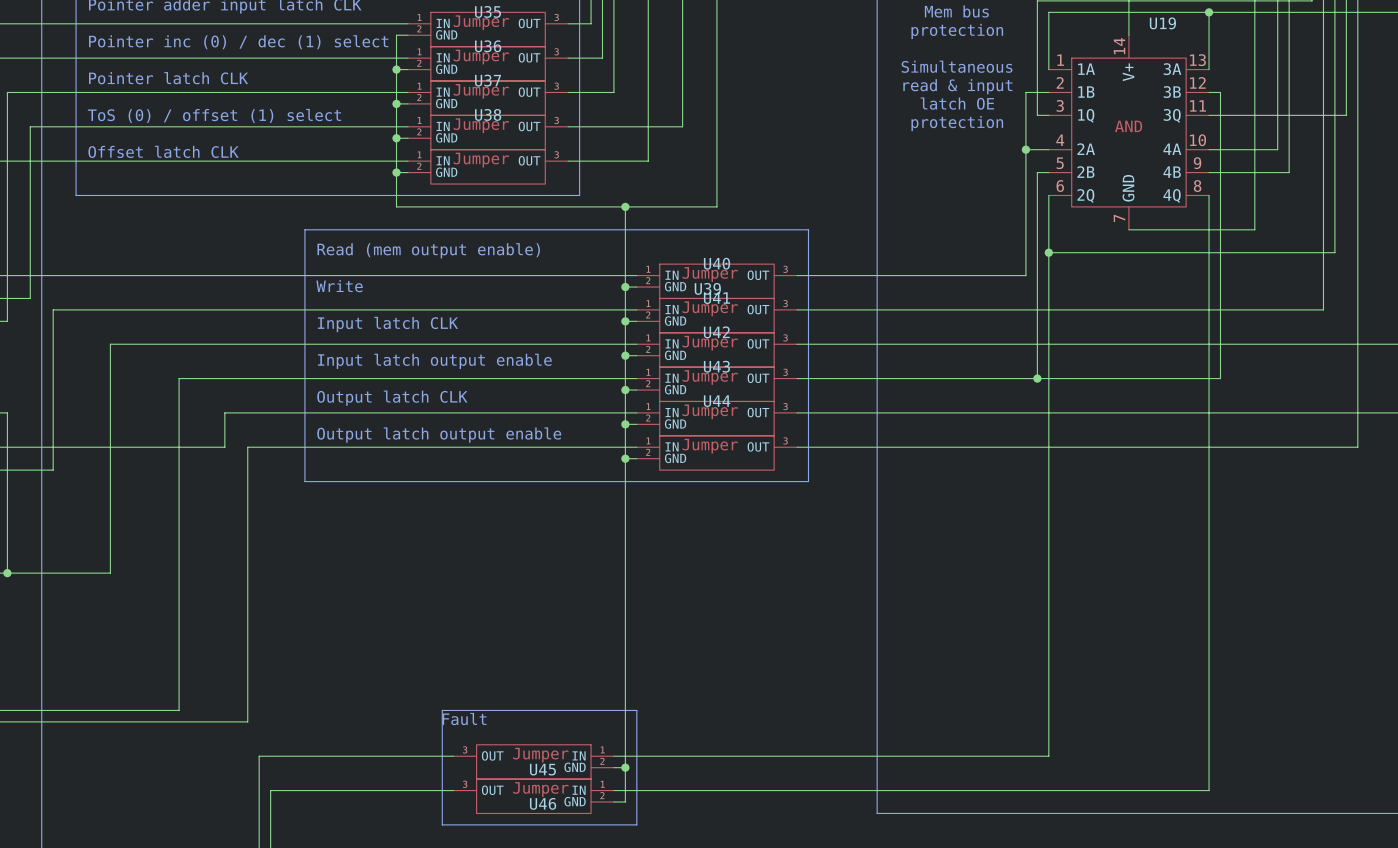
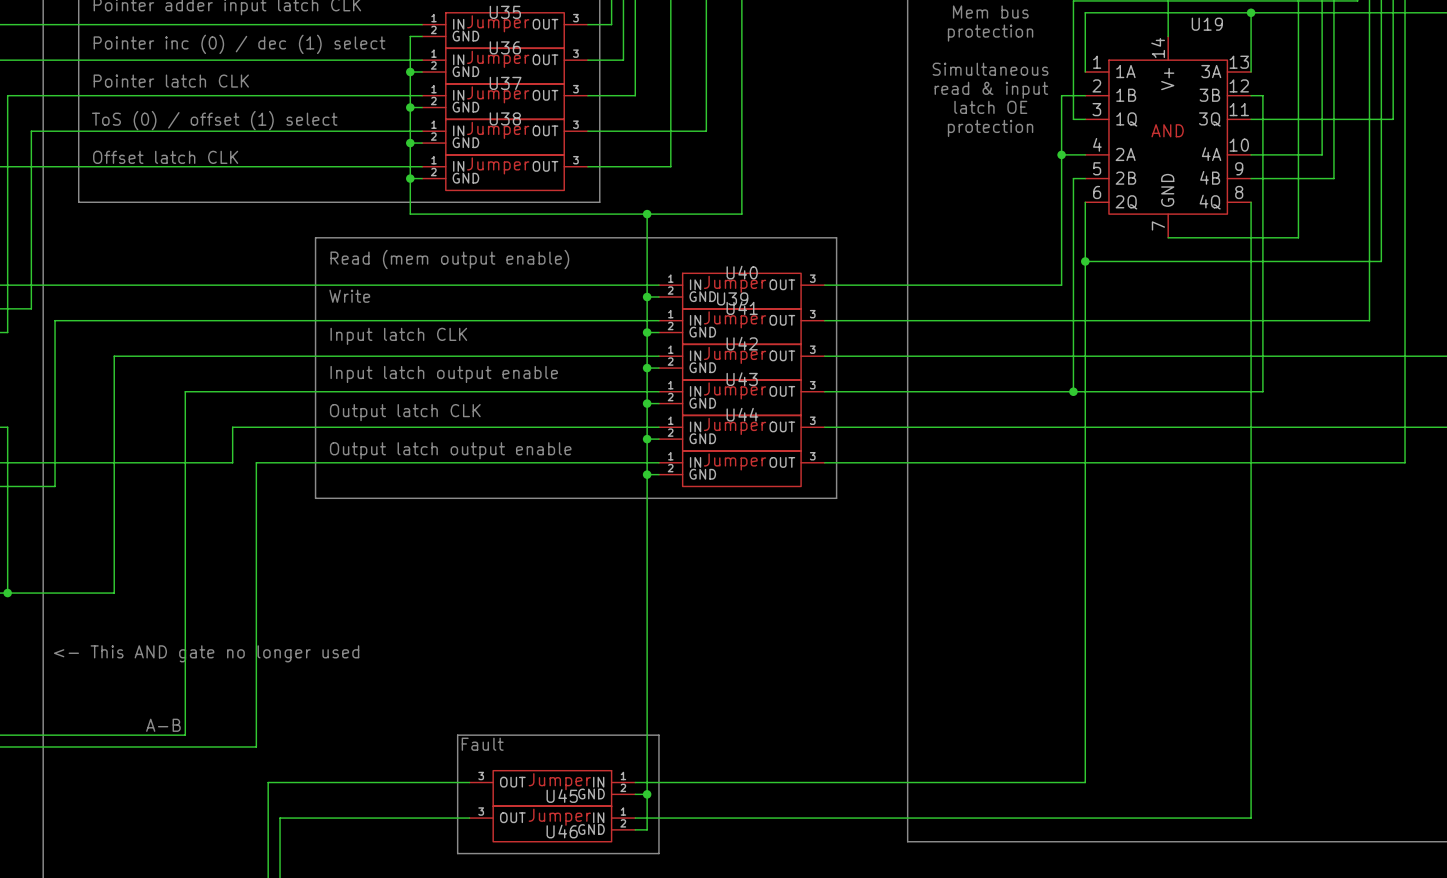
text: none -> <- This AND gate no longer used (206, 653)
text: none -> A-B (163, 725)

